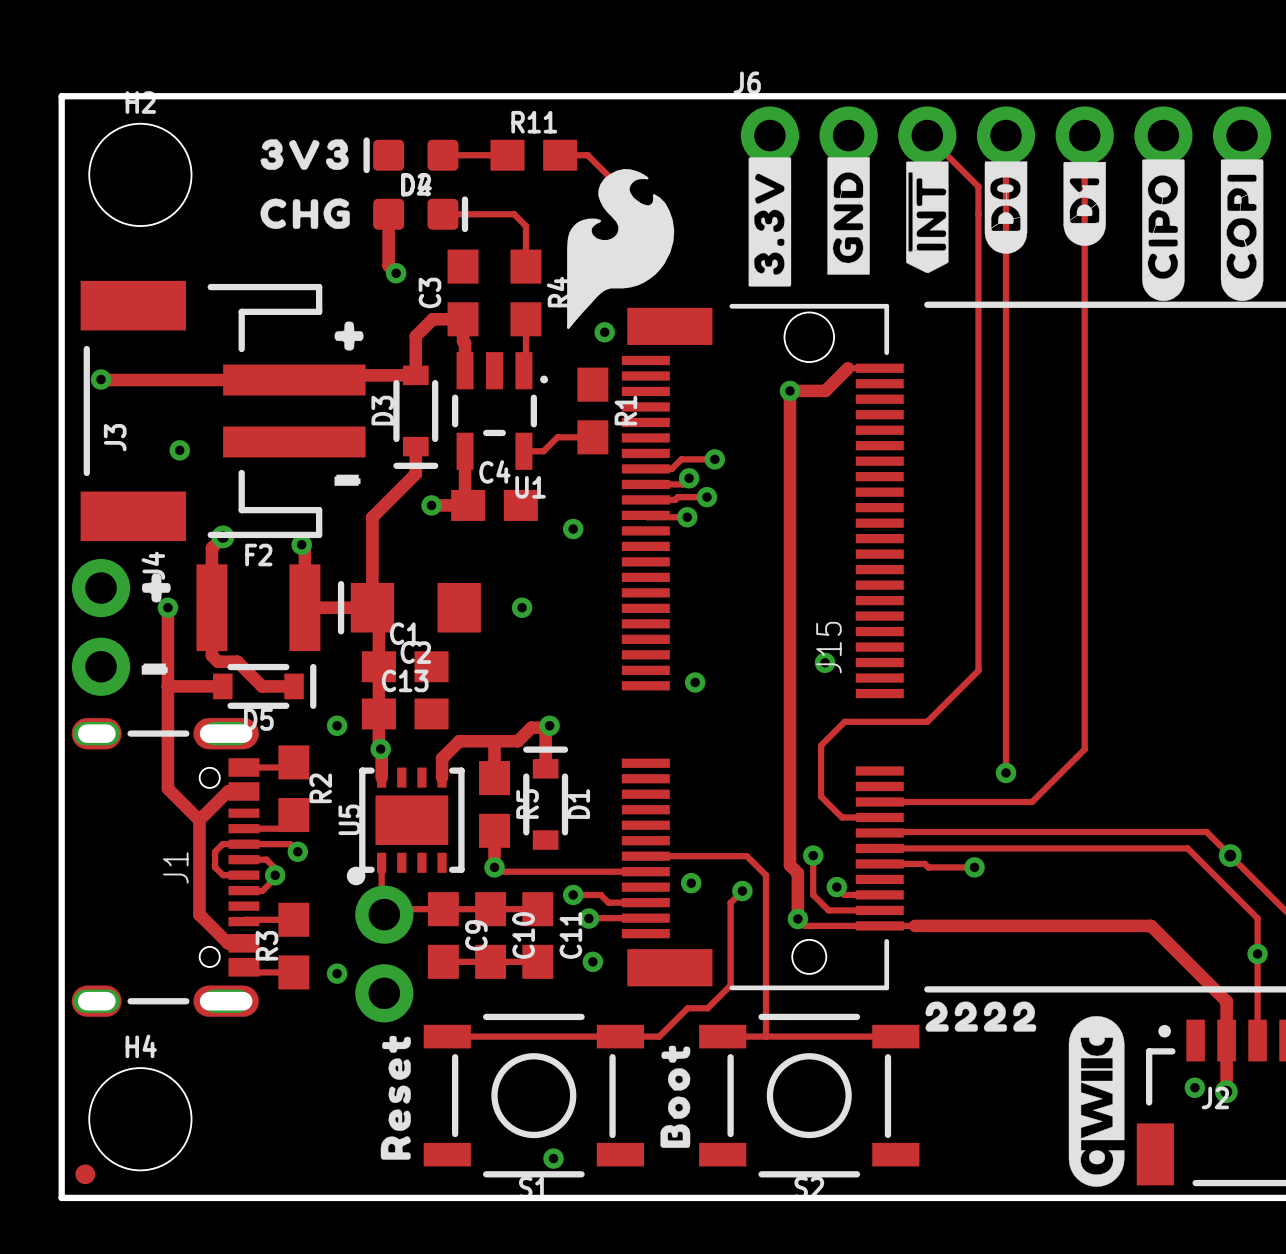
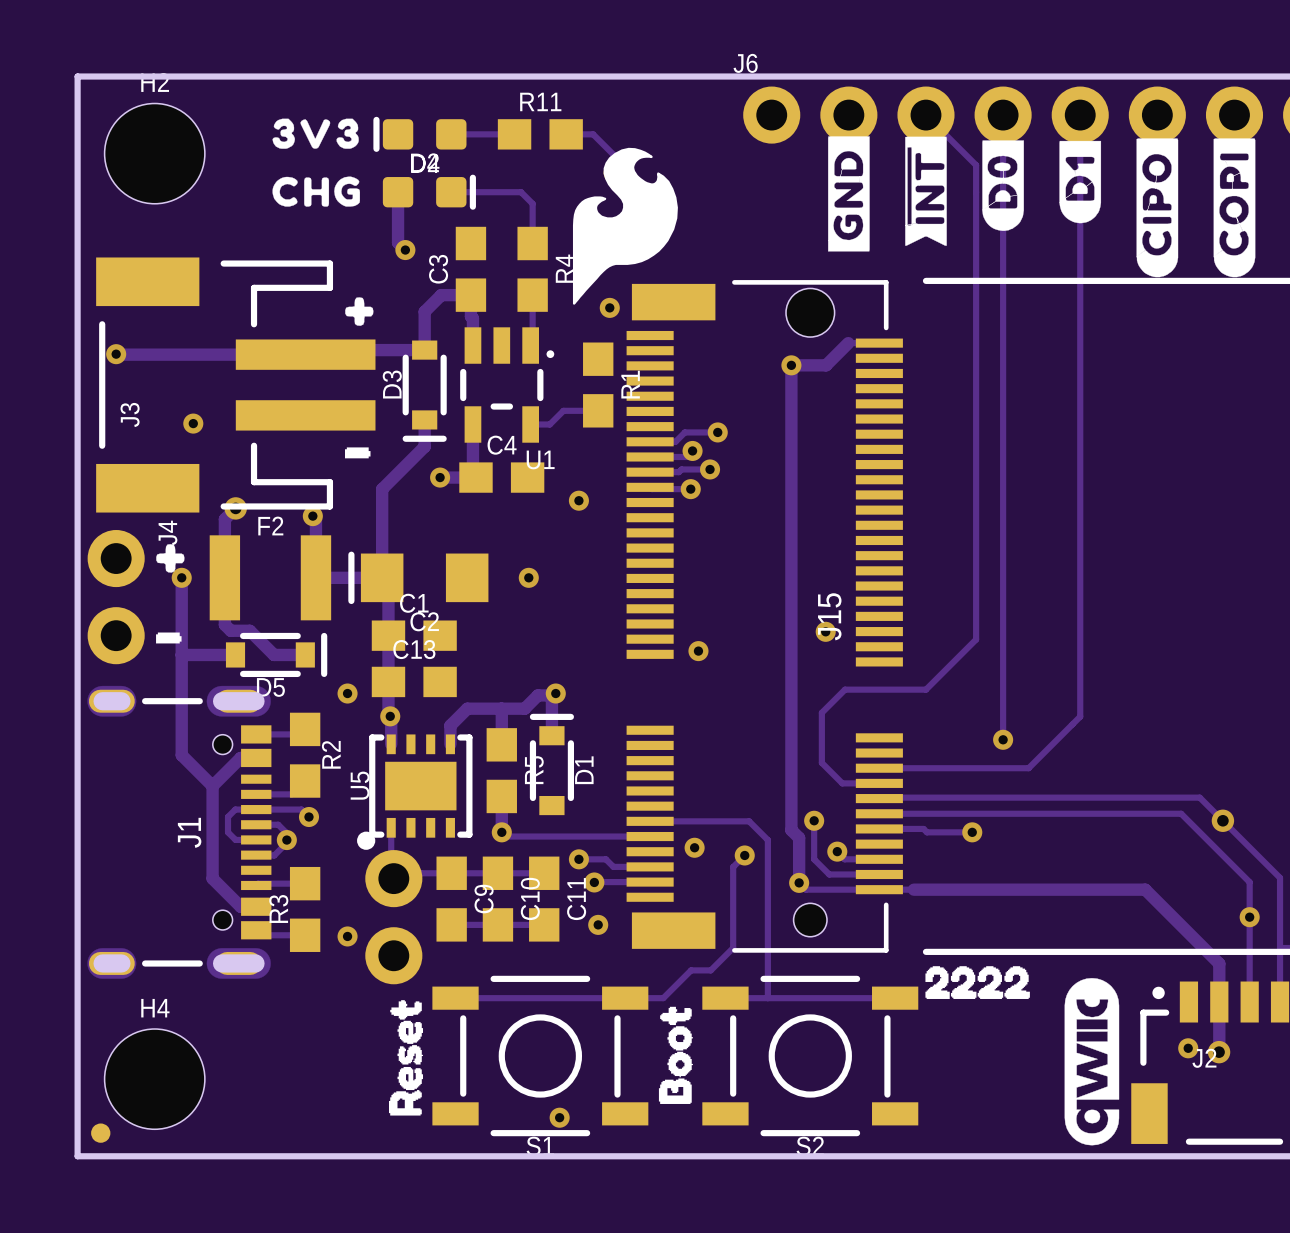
drawing: [748, 157, 792, 287] -> none
drawing shape: [906, 161, 949, 274] -> [905, 136, 947, 246]
drawing shape: [925, 1001, 1037, 1032] -> [925, 966, 1030, 999]
drawing shape: [380, 1035, 411, 1160] -> [388, 1000, 424, 1116]
drawing shape: [660, 1045, 691, 1148] -> [658, 1006, 693, 1104]

